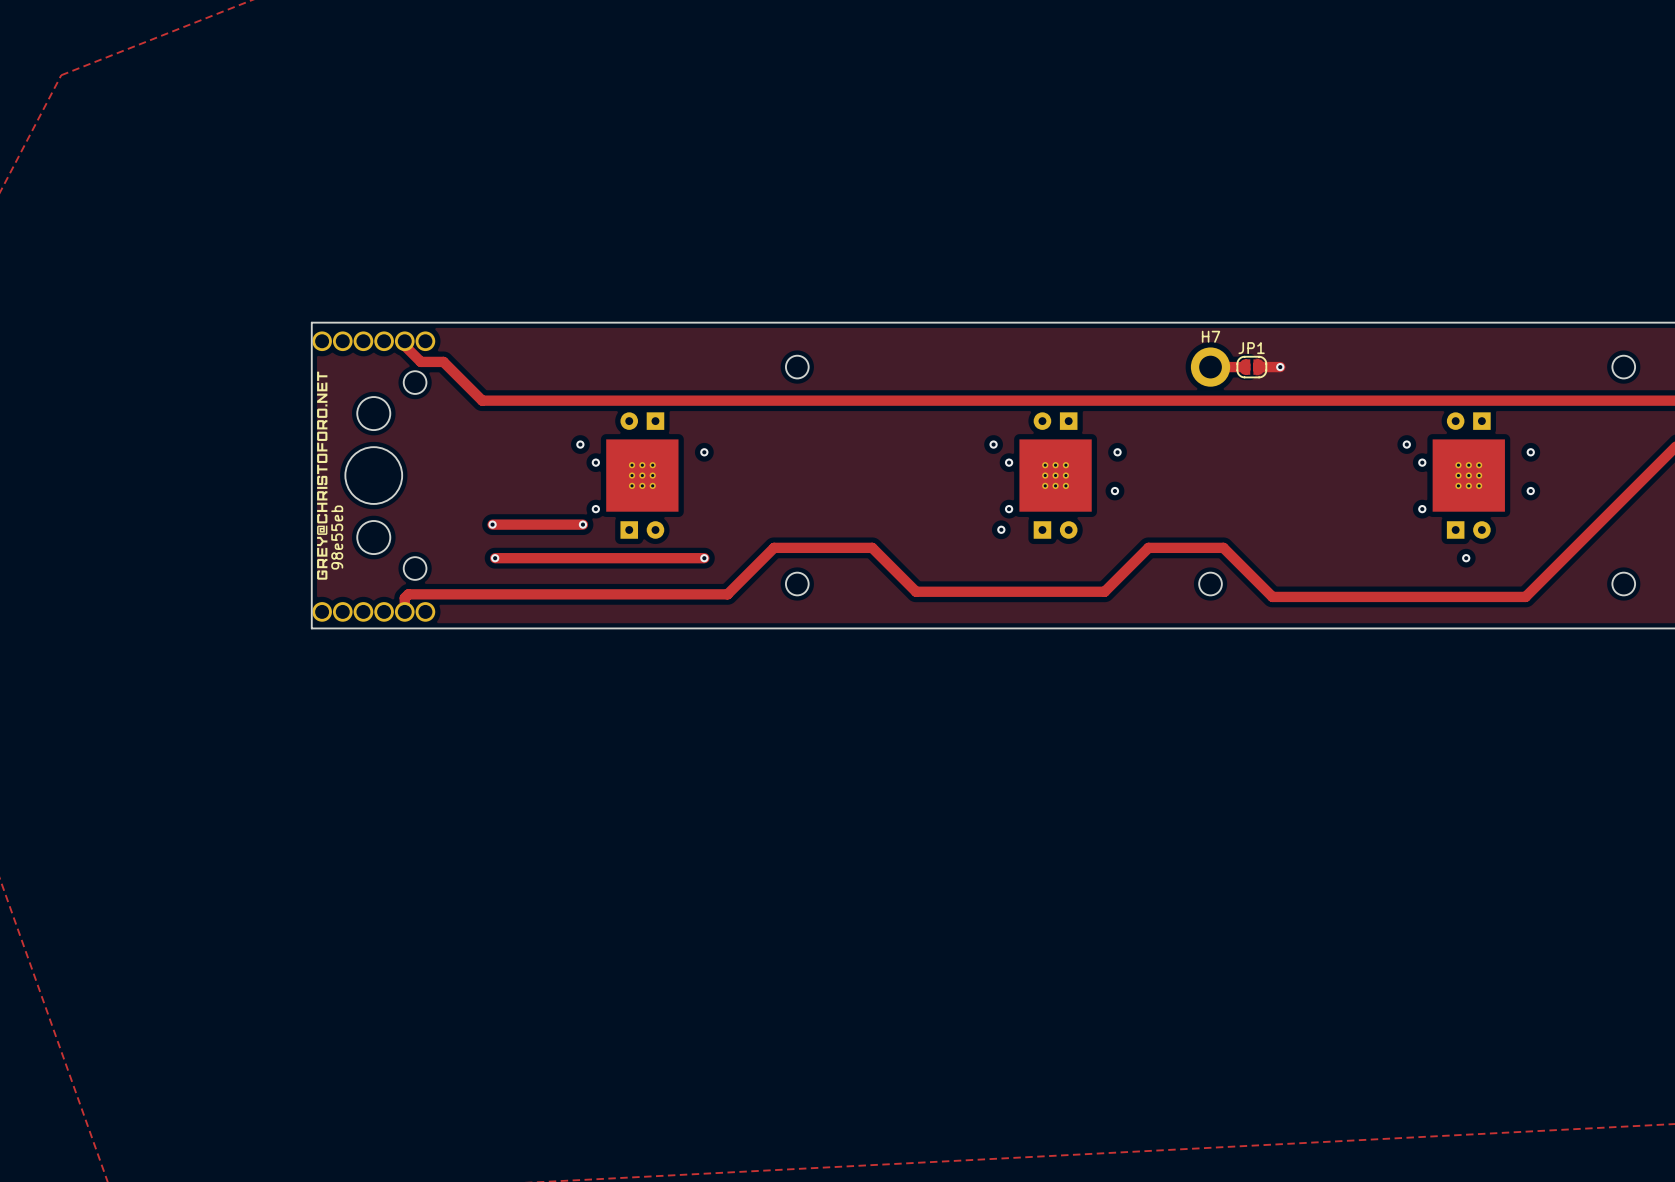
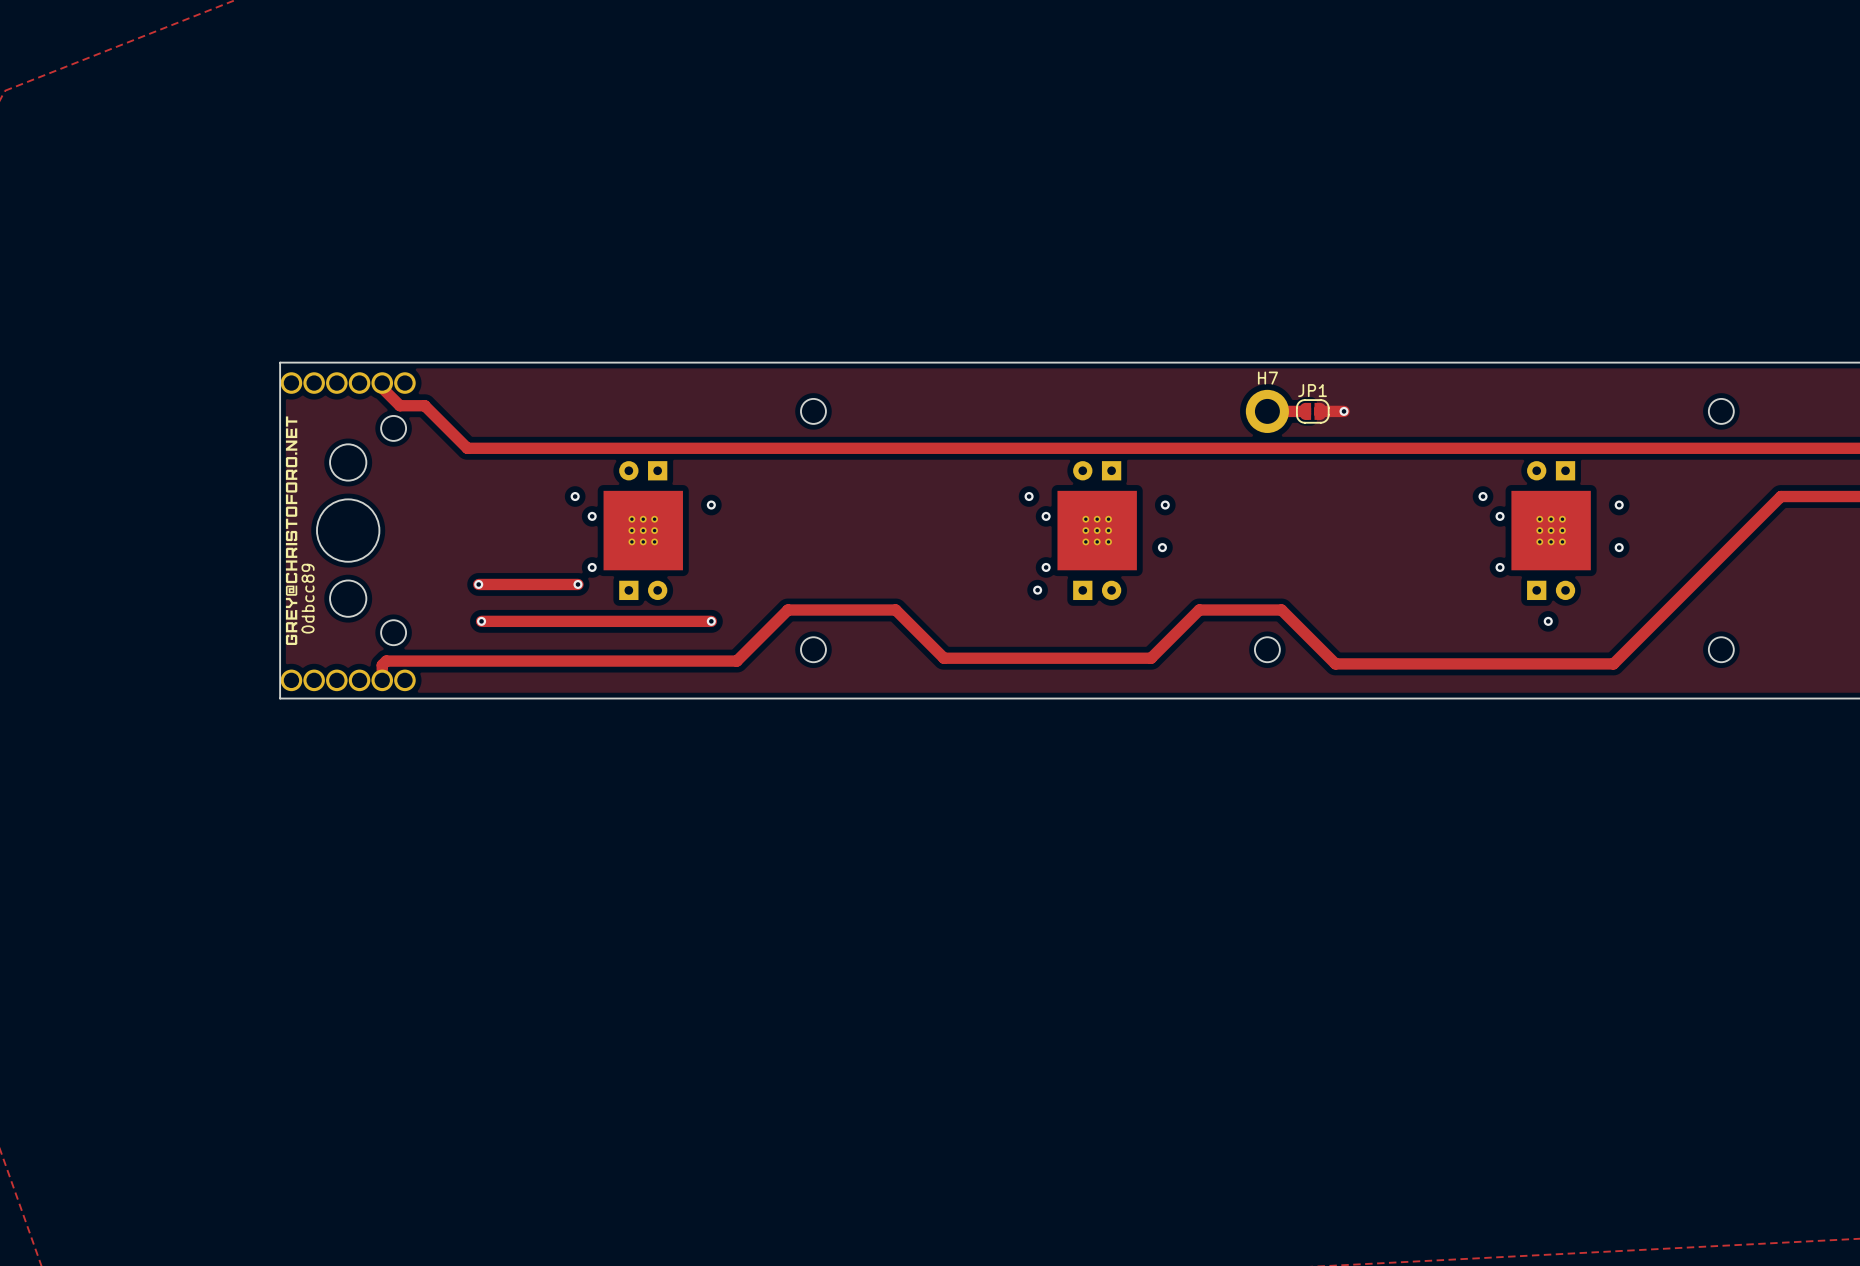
text: 98e55eb (337, 537) -> 0dbcc89 (308, 598)

